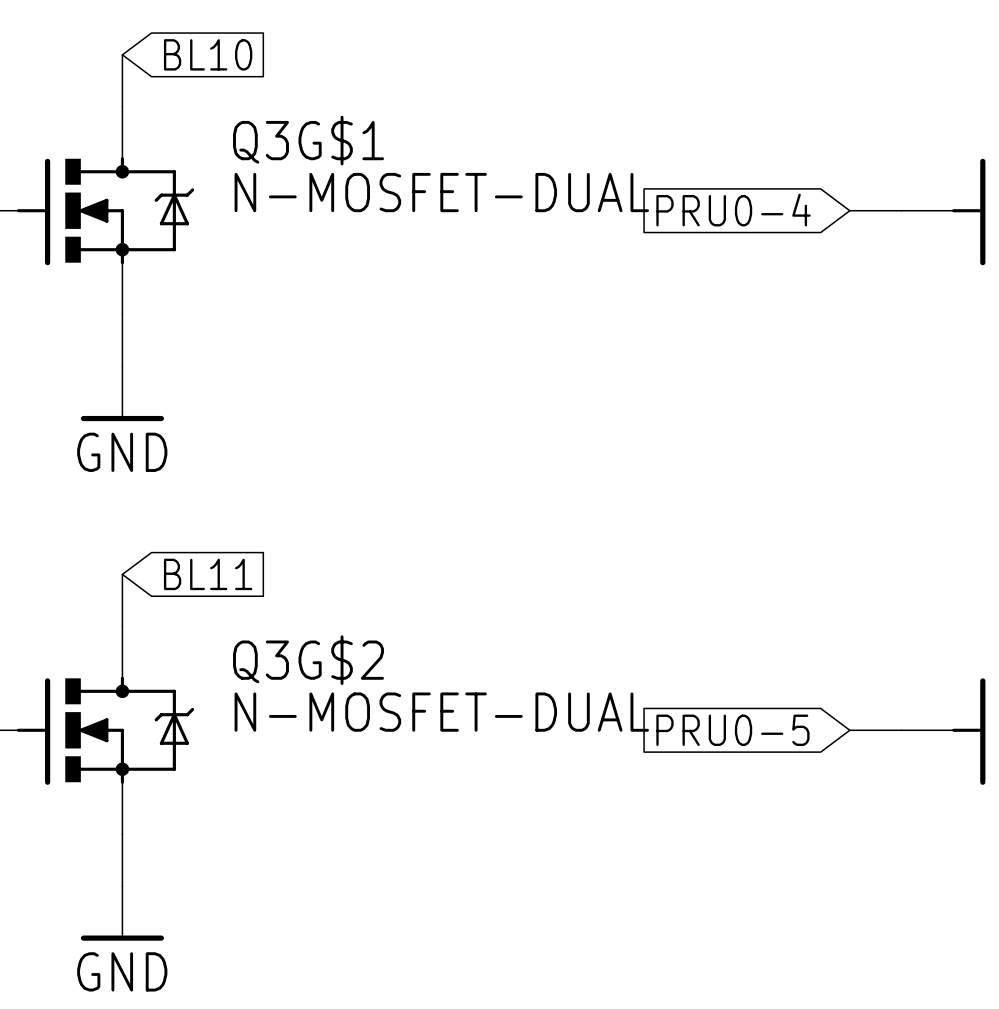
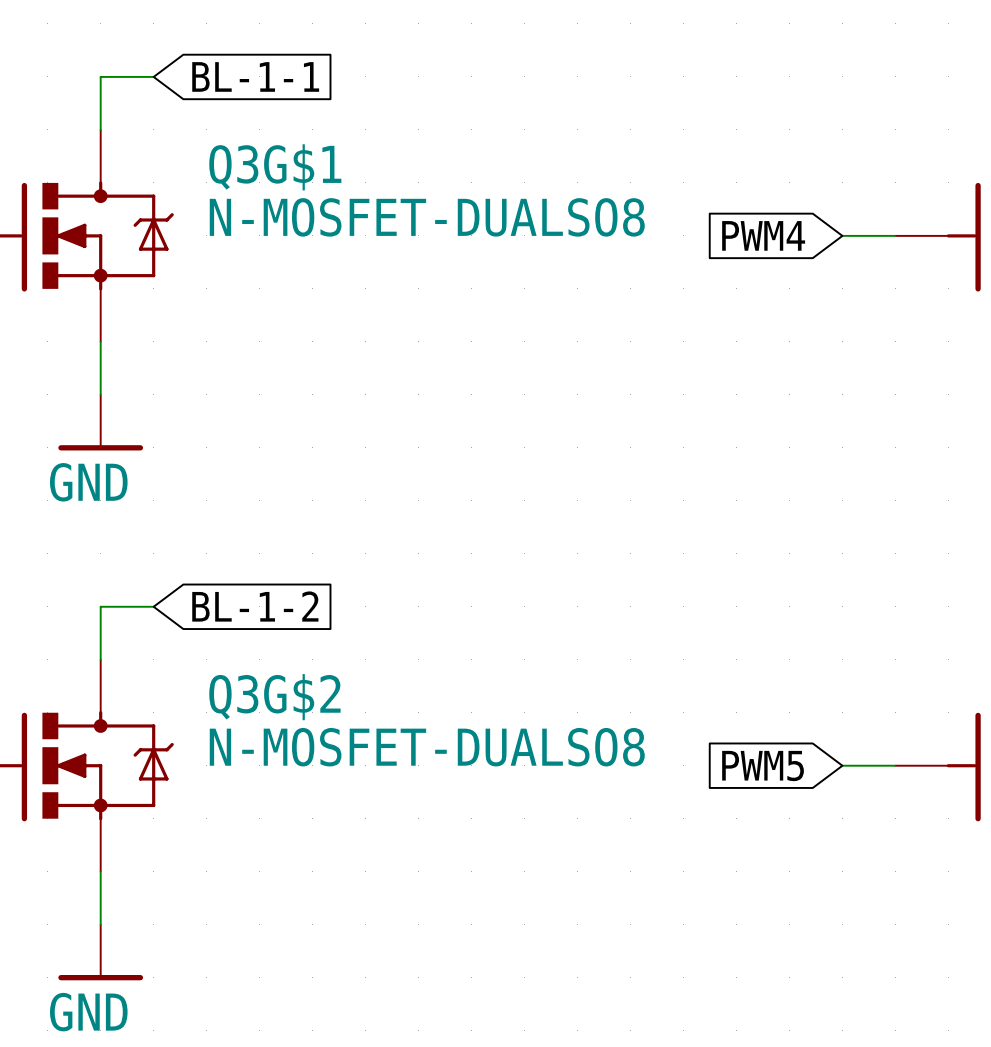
wire: none -> (100, 76) (153, 76)
global label: BL10 (208, 54) -> none
global label: none -> BL-1-1 (255, 76)
Q3G$1 value: N-MOSFET-DUAL (441, 192) -> N-MOSFET-DUALSO8 (427, 217)
global label: PRU0-4 (733, 210) -> PWM4 (763, 235)
wire: none -> (100, 606) (153, 606)
global label: BL11 (208, 574) -> none
global label: none -> BL-1-2 (255, 606)
Q3G$2 value: N-MOSFET-DUAL (441, 712) -> N-MOSFET-DUALSO8 (427, 747)
global label: PRU0-5 (732, 730) -> PWM5 (763, 766)

